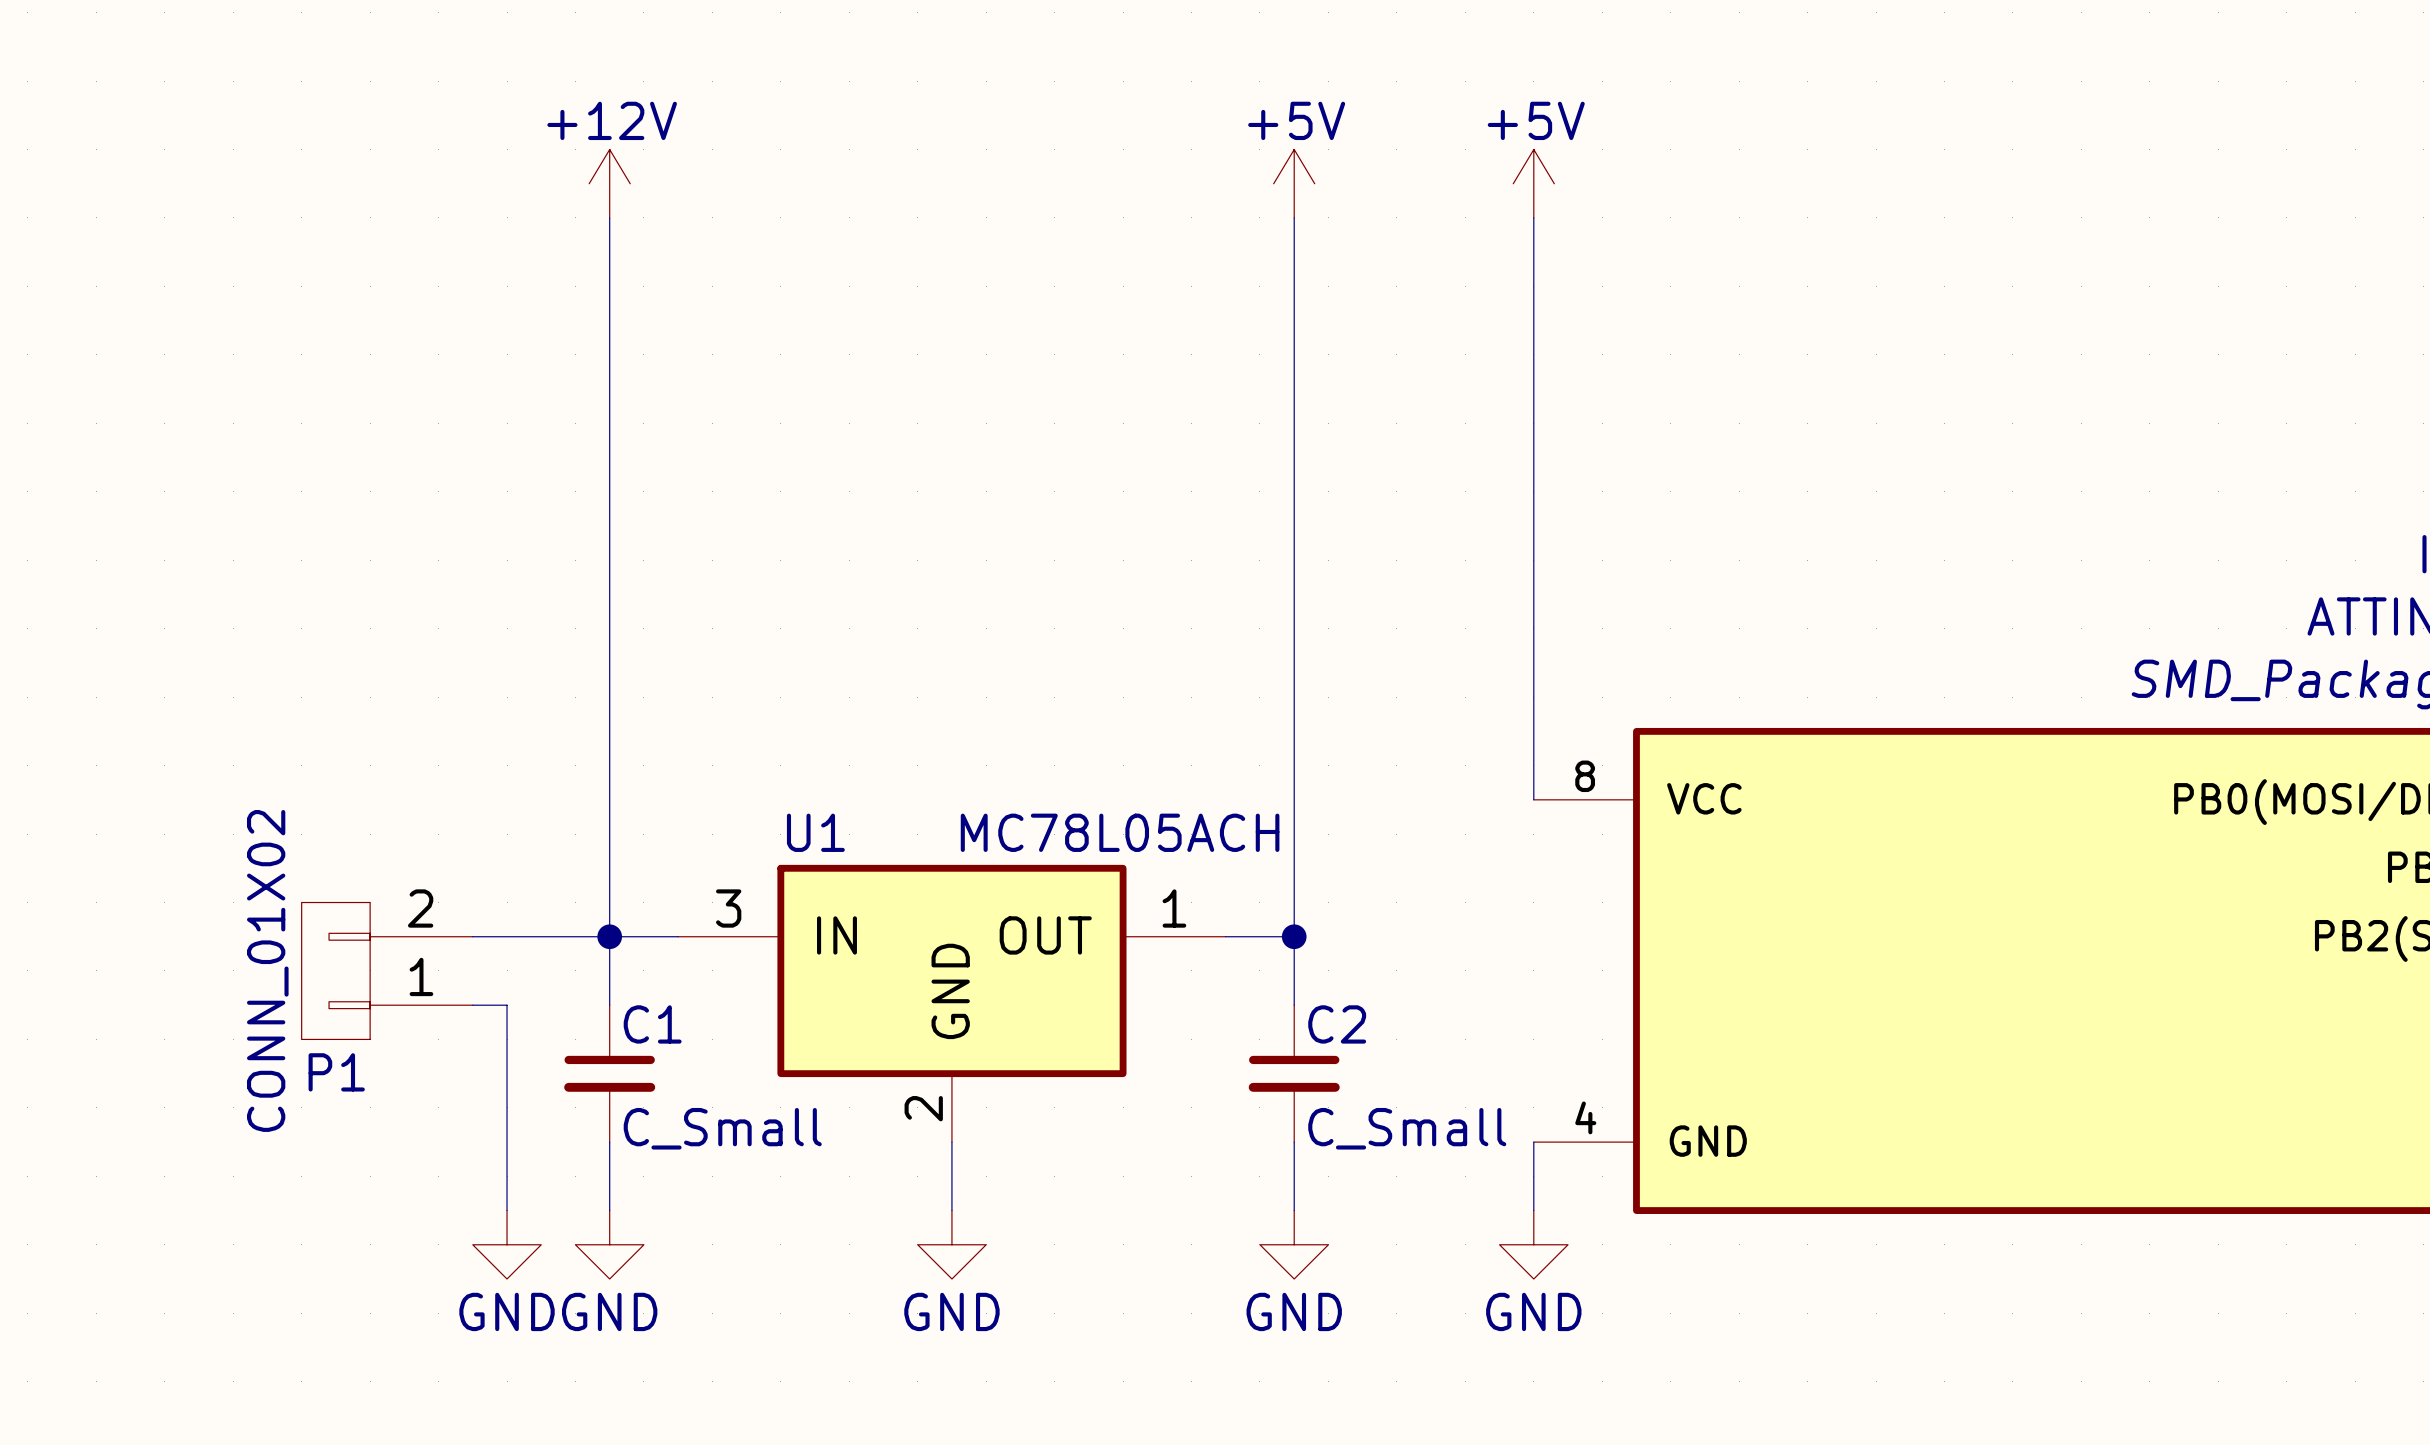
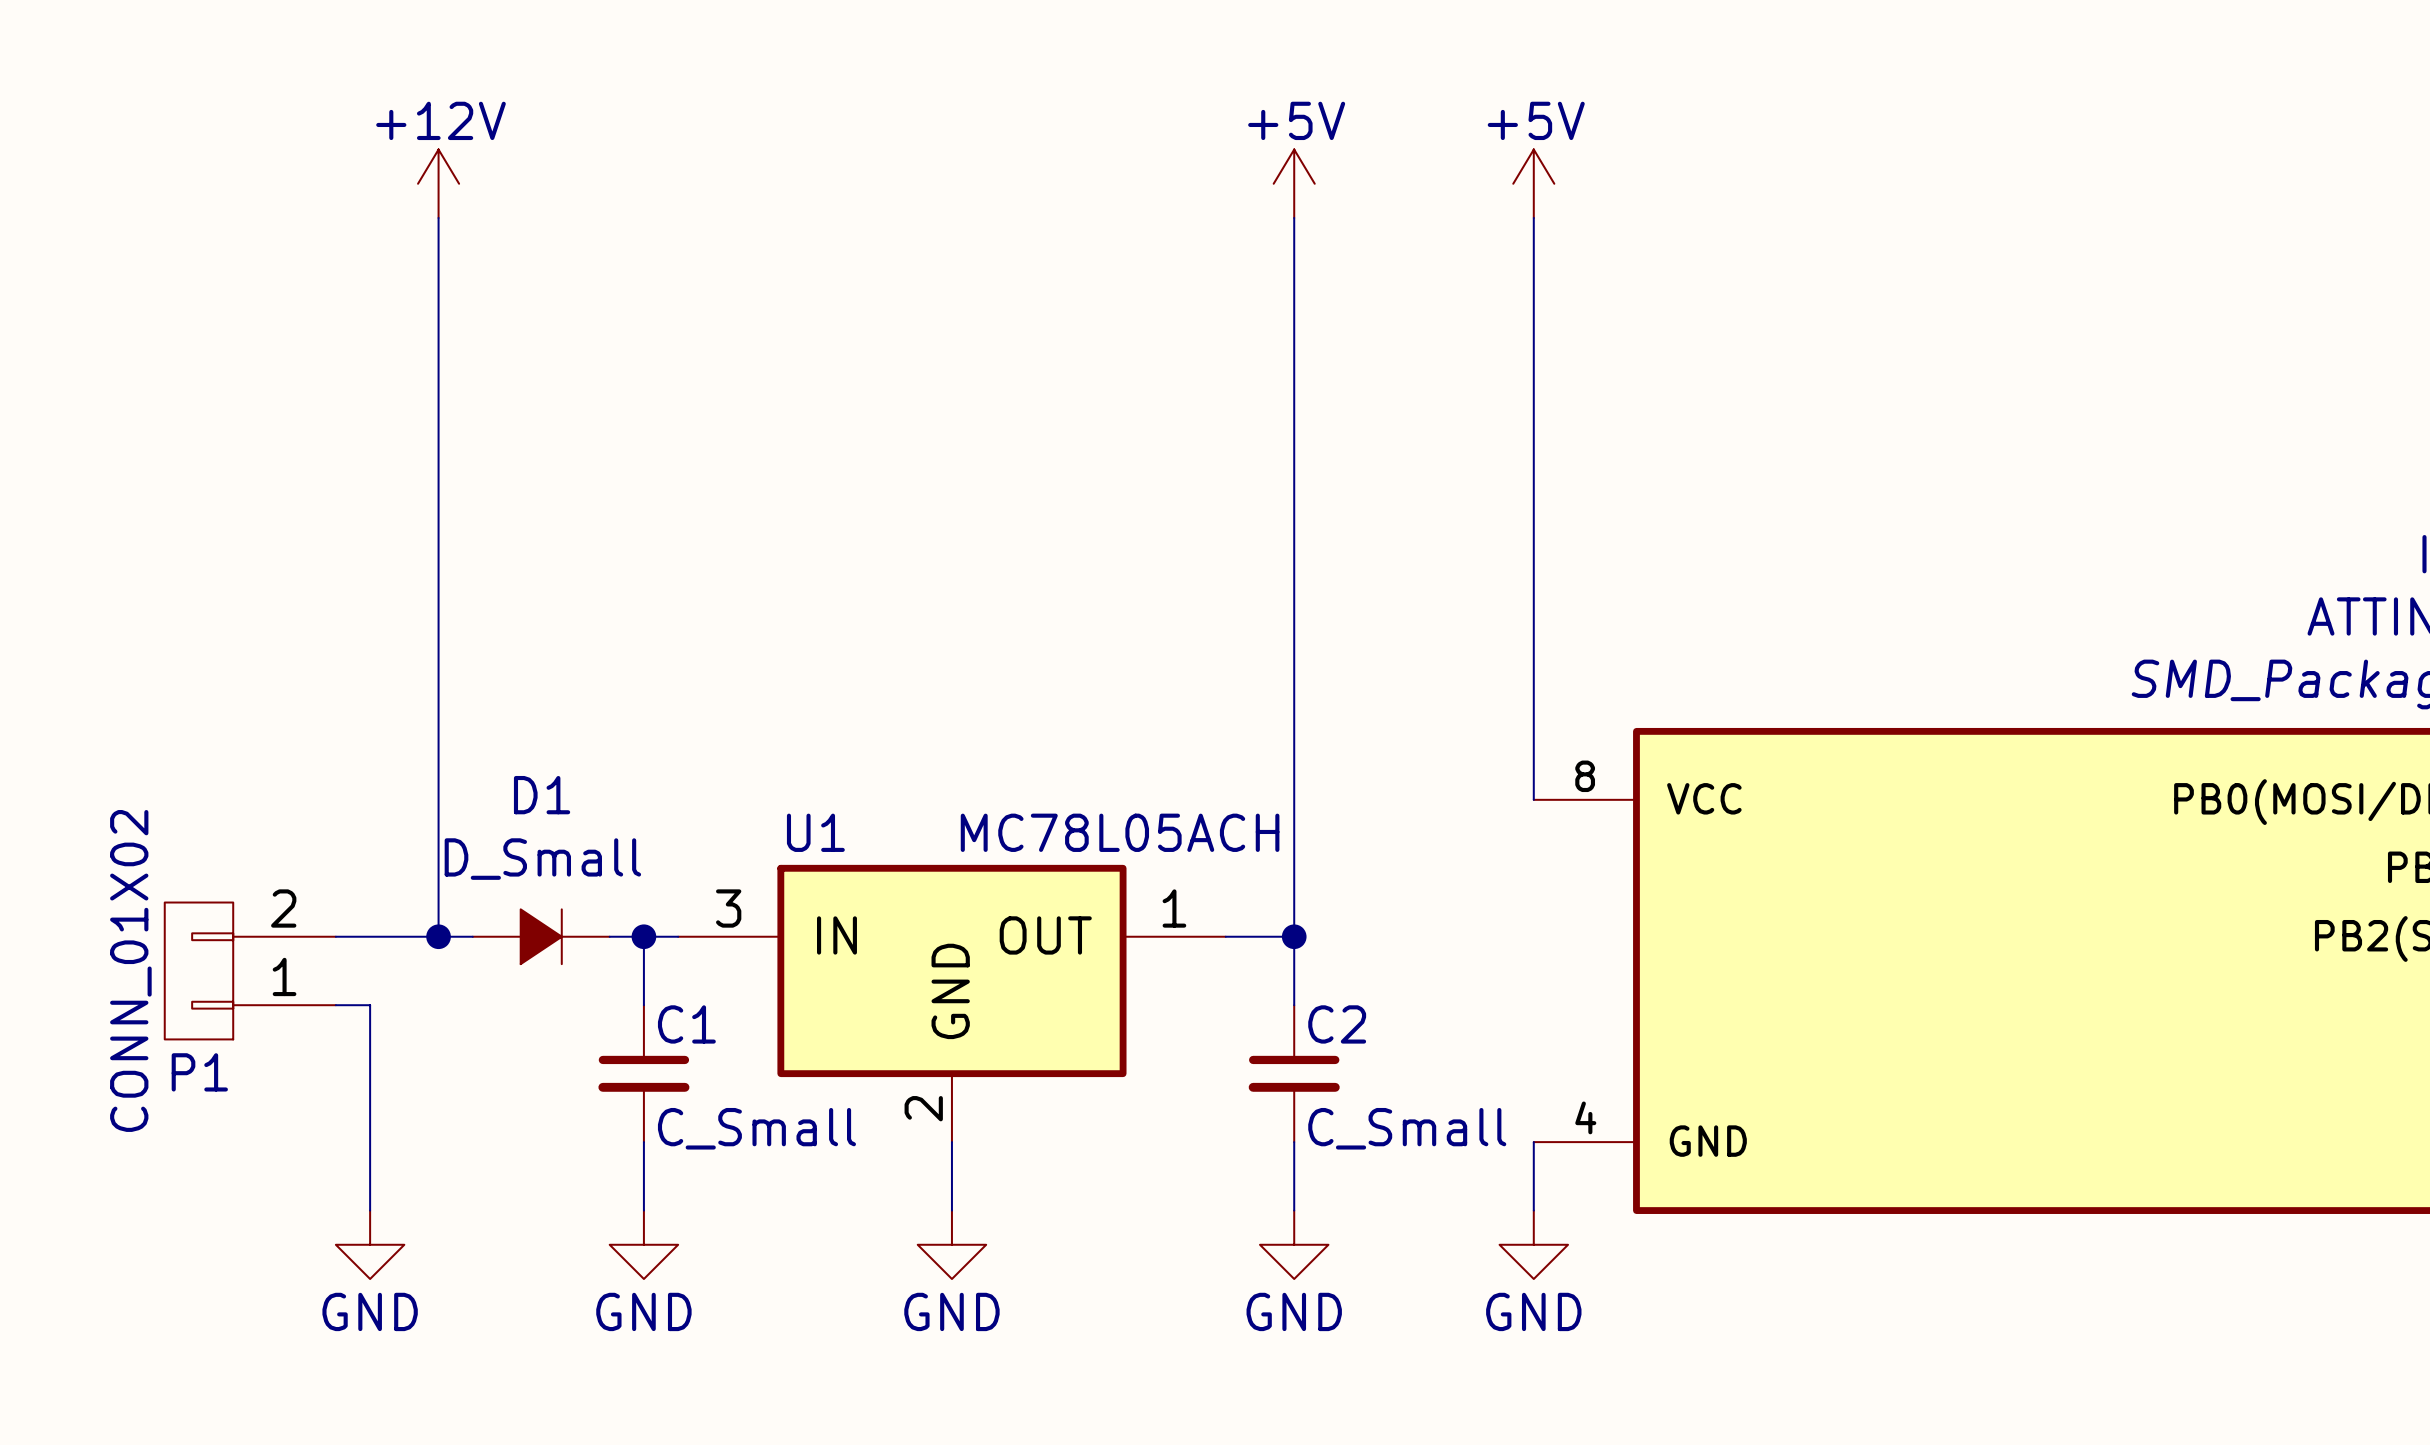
power symbol position: +12V (609, 183) -> +12V (438, 183)
wire: none -> (438, 217) (438, 936)
wire: (609, 217) (609, 1005) -> none
junction: none -> (438, 936)
D1: none -> D_Small (541, 936)
junction position: (609, 936) -> (643, 936)
wire: none -> (643, 936) (643, 1005)
P1 position: (387, 970) -> (250, 970)
wire: (472, 1005) (507, 1005) (507, 1210) -> (335, 1005) (370, 1005) (370, 1210)
C1 position: (609, 1073) -> (643, 1073)
wire: (609, 1142) (609, 1210) -> (643, 1142) (643, 1210)
power symbol: none -> GND (370, 1244)
power symbol: GND (507, 1244) -> none
power symbol position: GND (609, 1244) -> GND (643, 1244)

